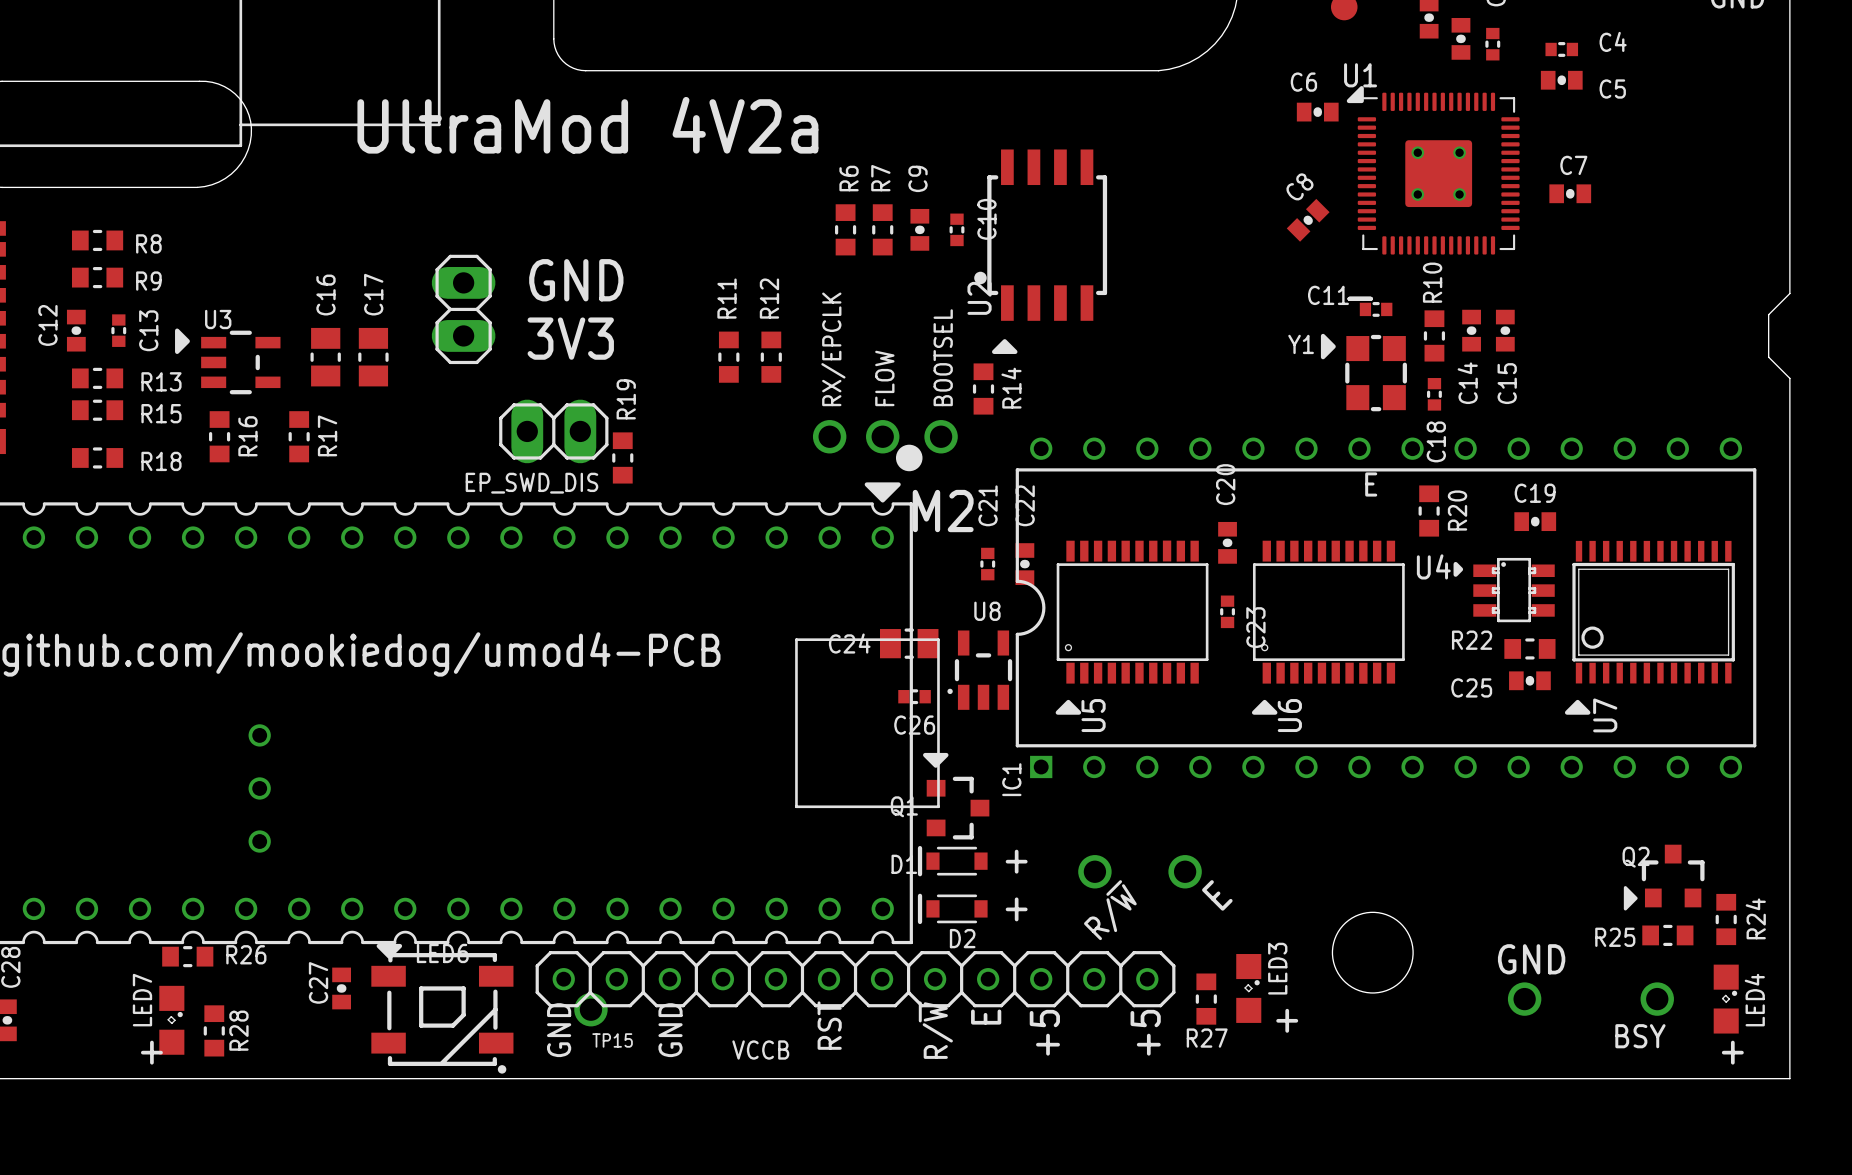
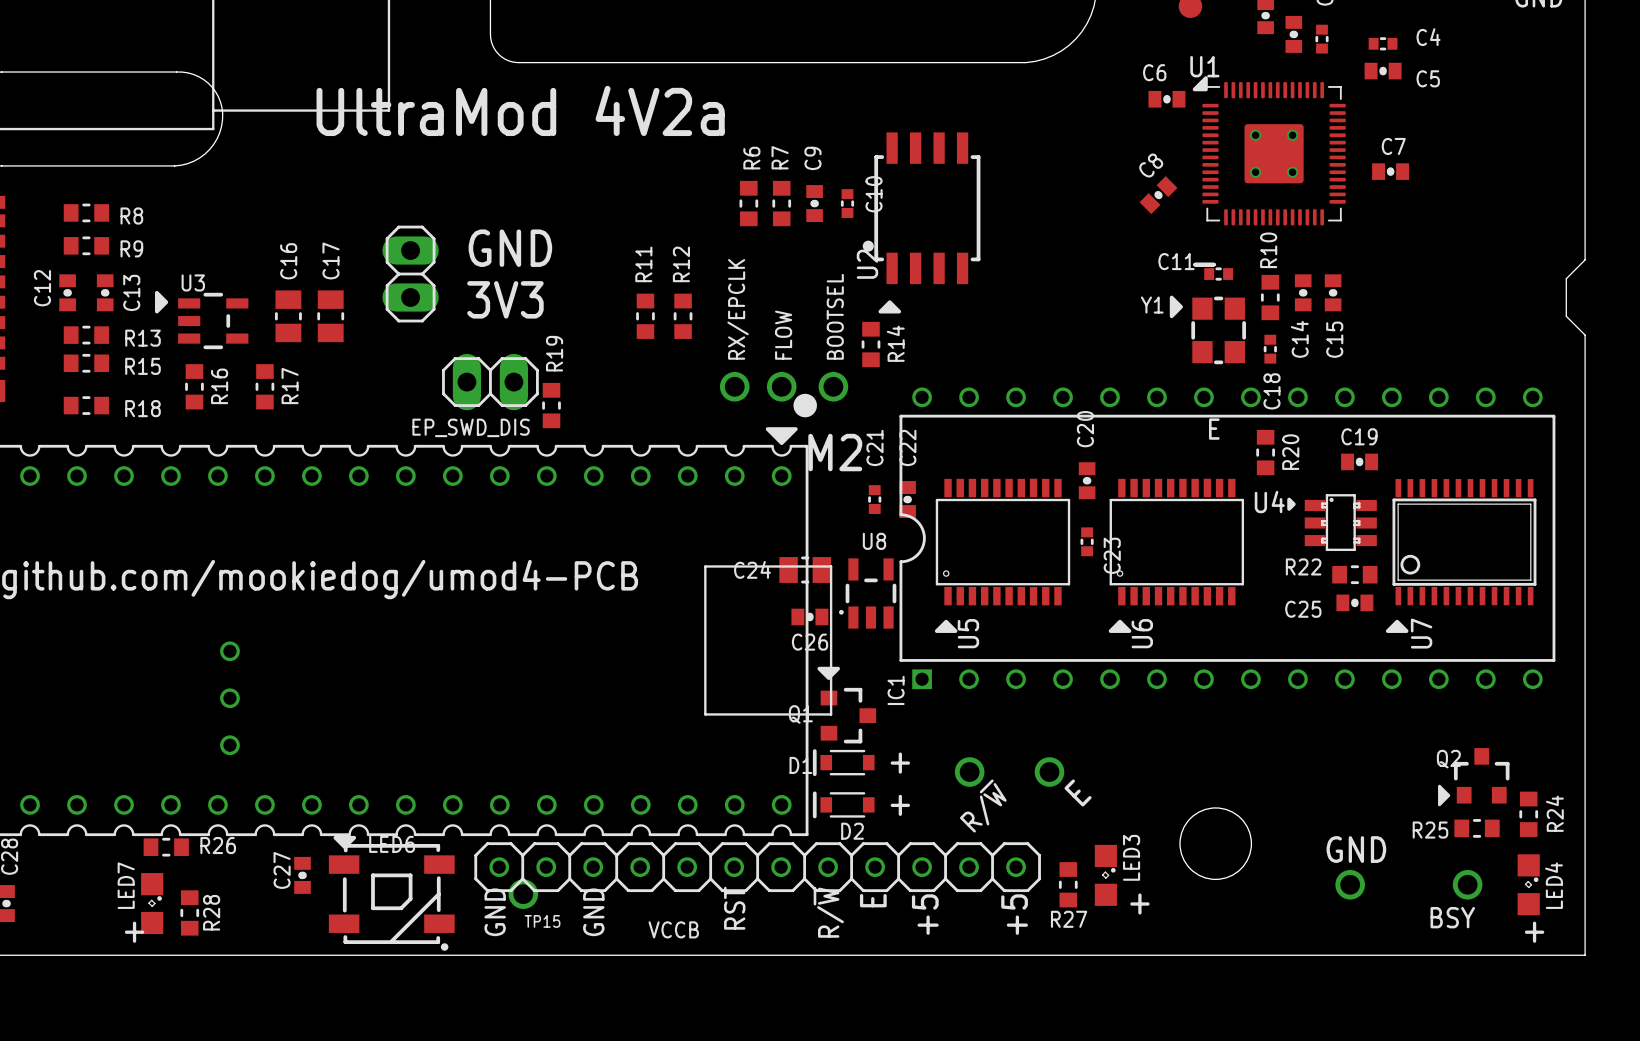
C13 footprint: [111, 314, 127, 347] -> [96, 274, 114, 312]
C26 footprint: [898, 689, 931, 705] -> [791, 608, 829, 626]

